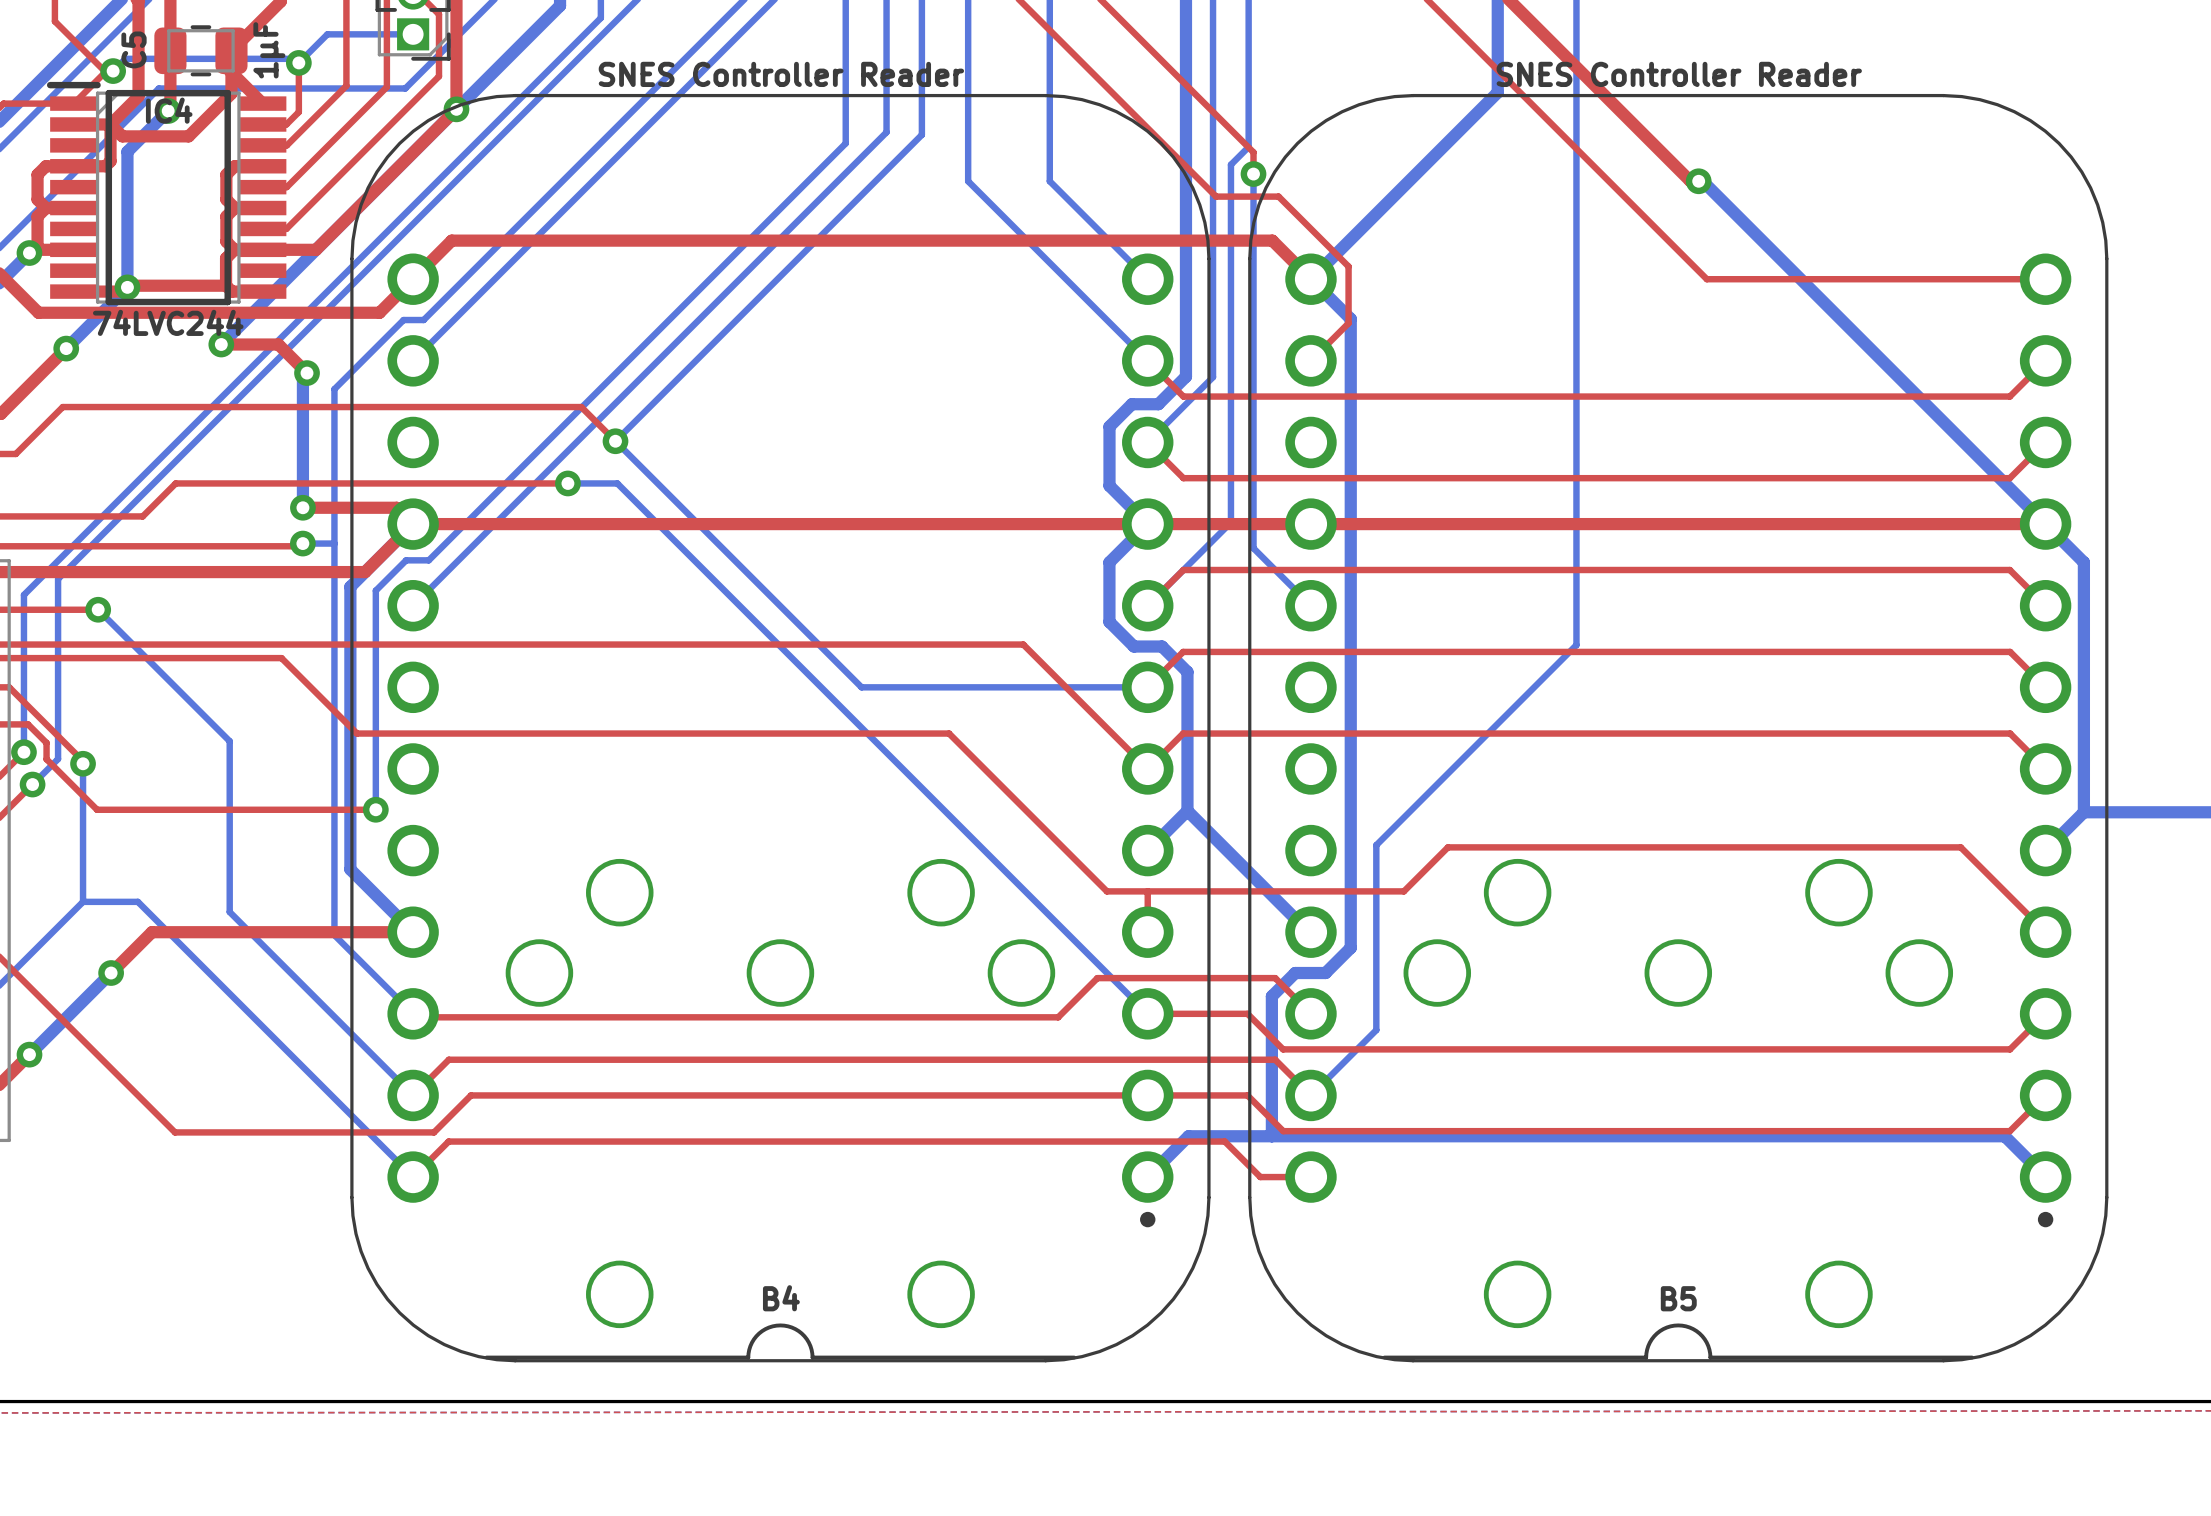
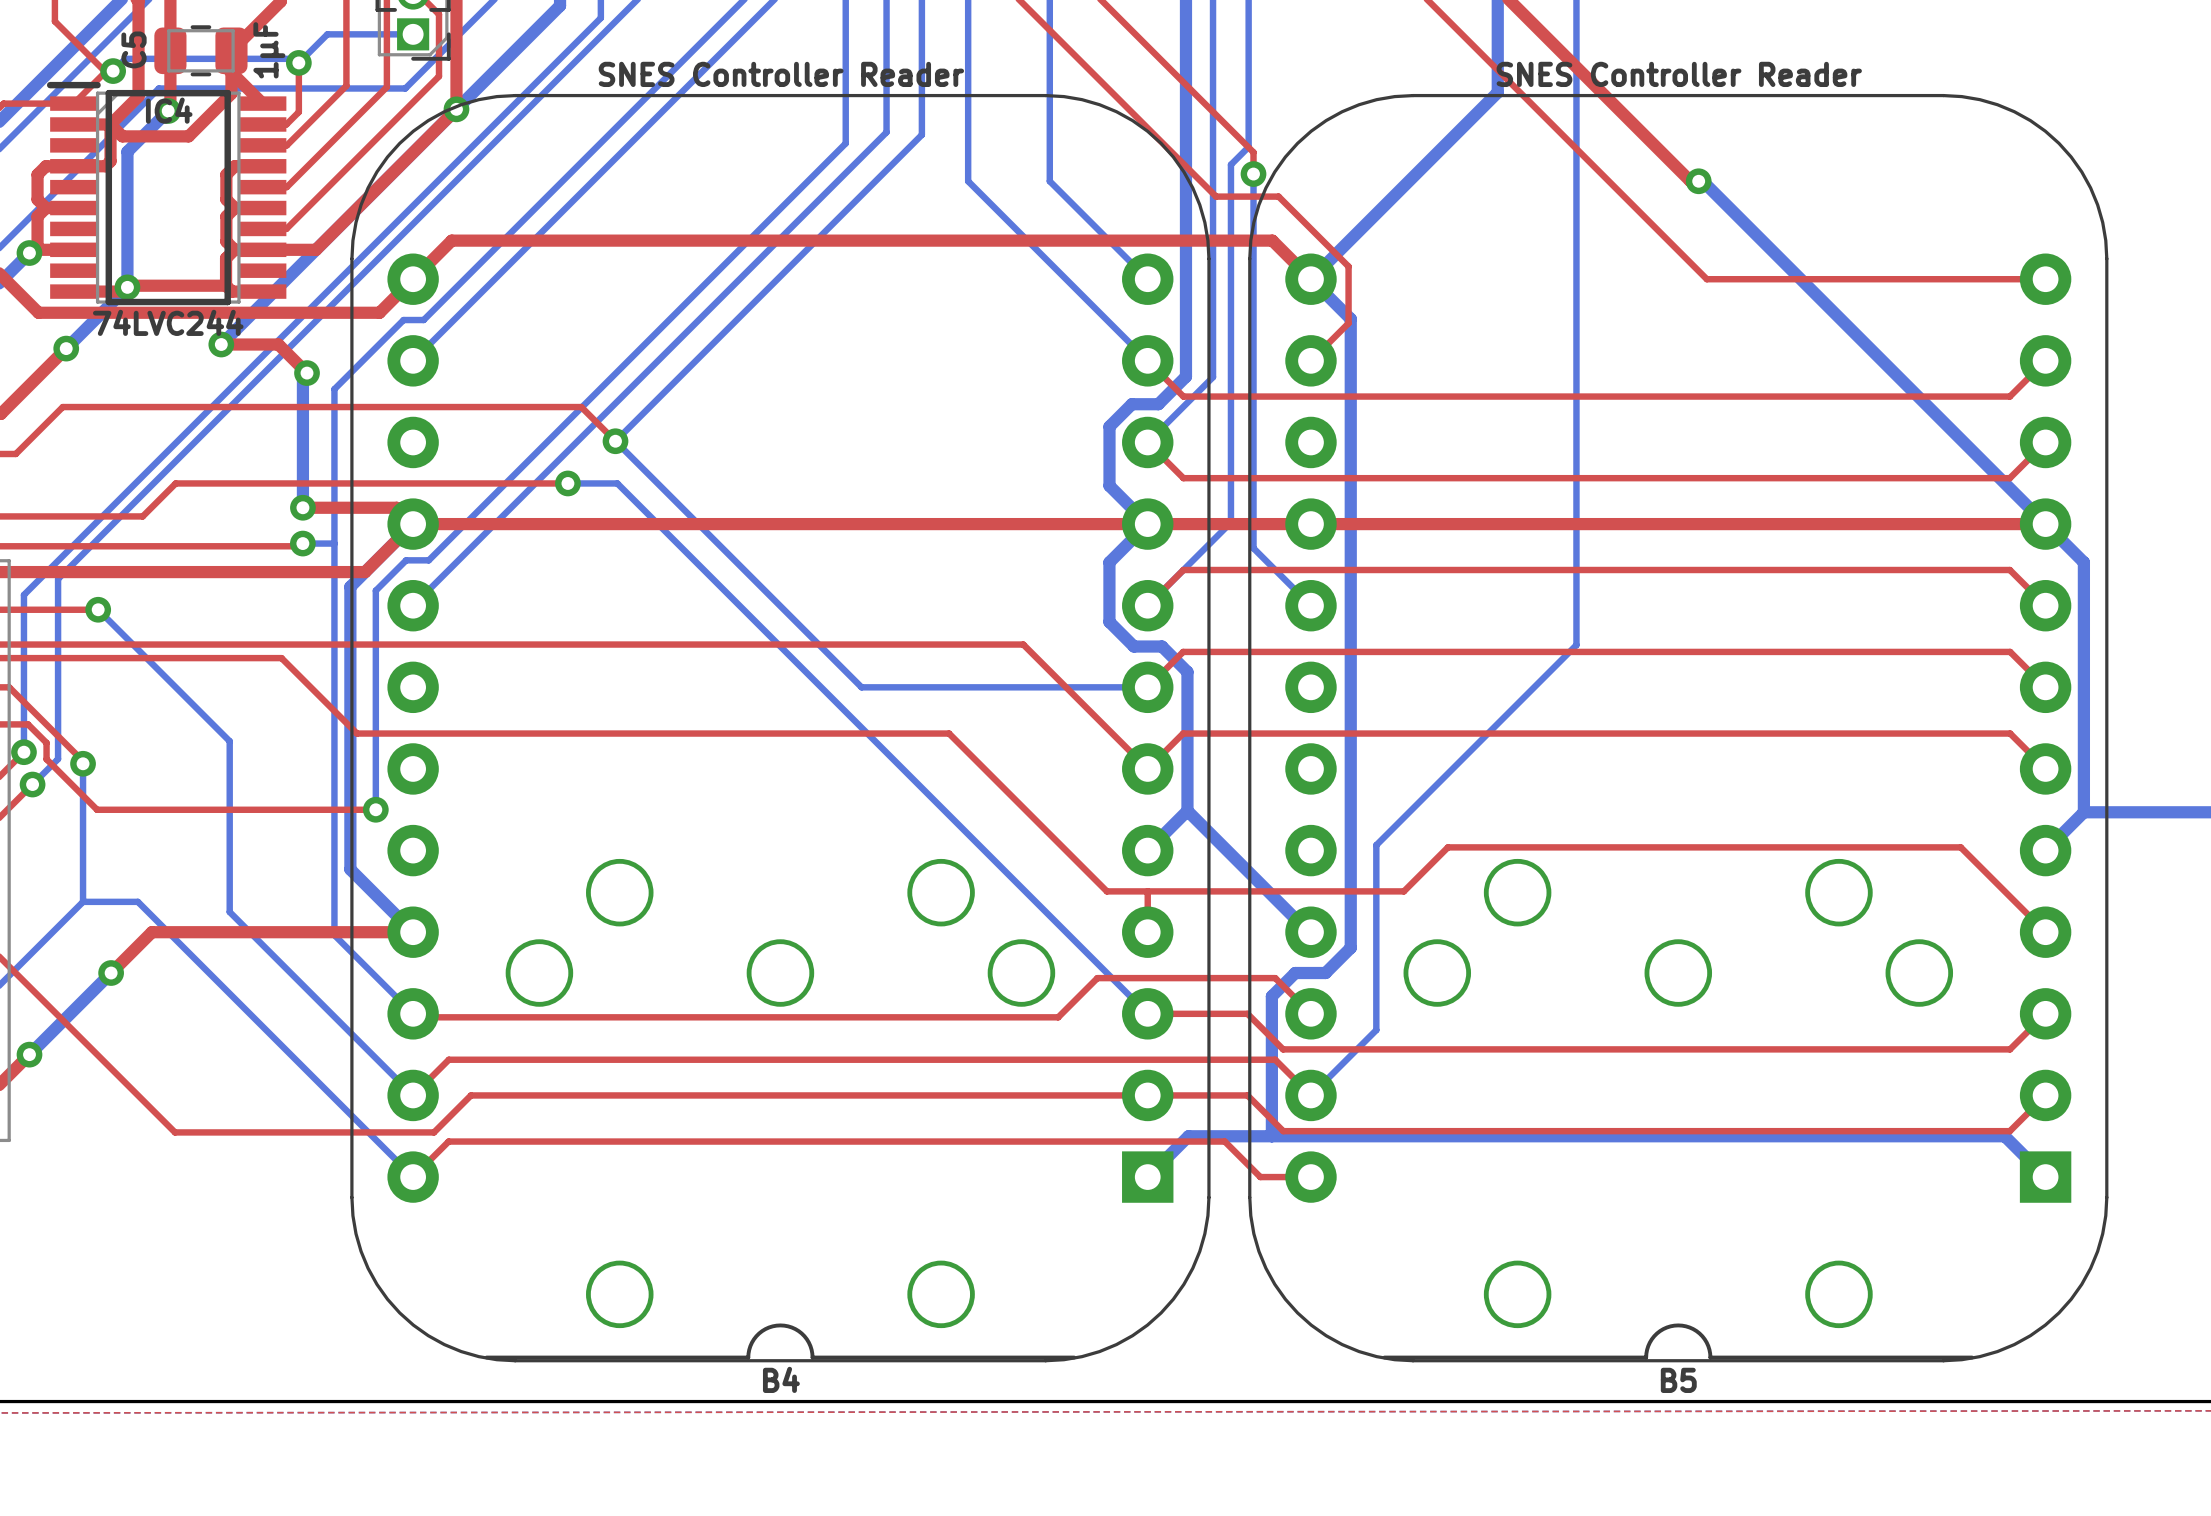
B4 footprint: [350, 93, 1211, 1363] -> [350, 93, 1211, 1363]
B5 footprint: [1248, 93, 2109, 1363] -> [1248, 93, 2109, 1363]
B4 name position: B4 (781, 1298) -> B4 (781, 1379)
B5 name position: B5 (1678, 1298) -> B5 (1678, 1380)

